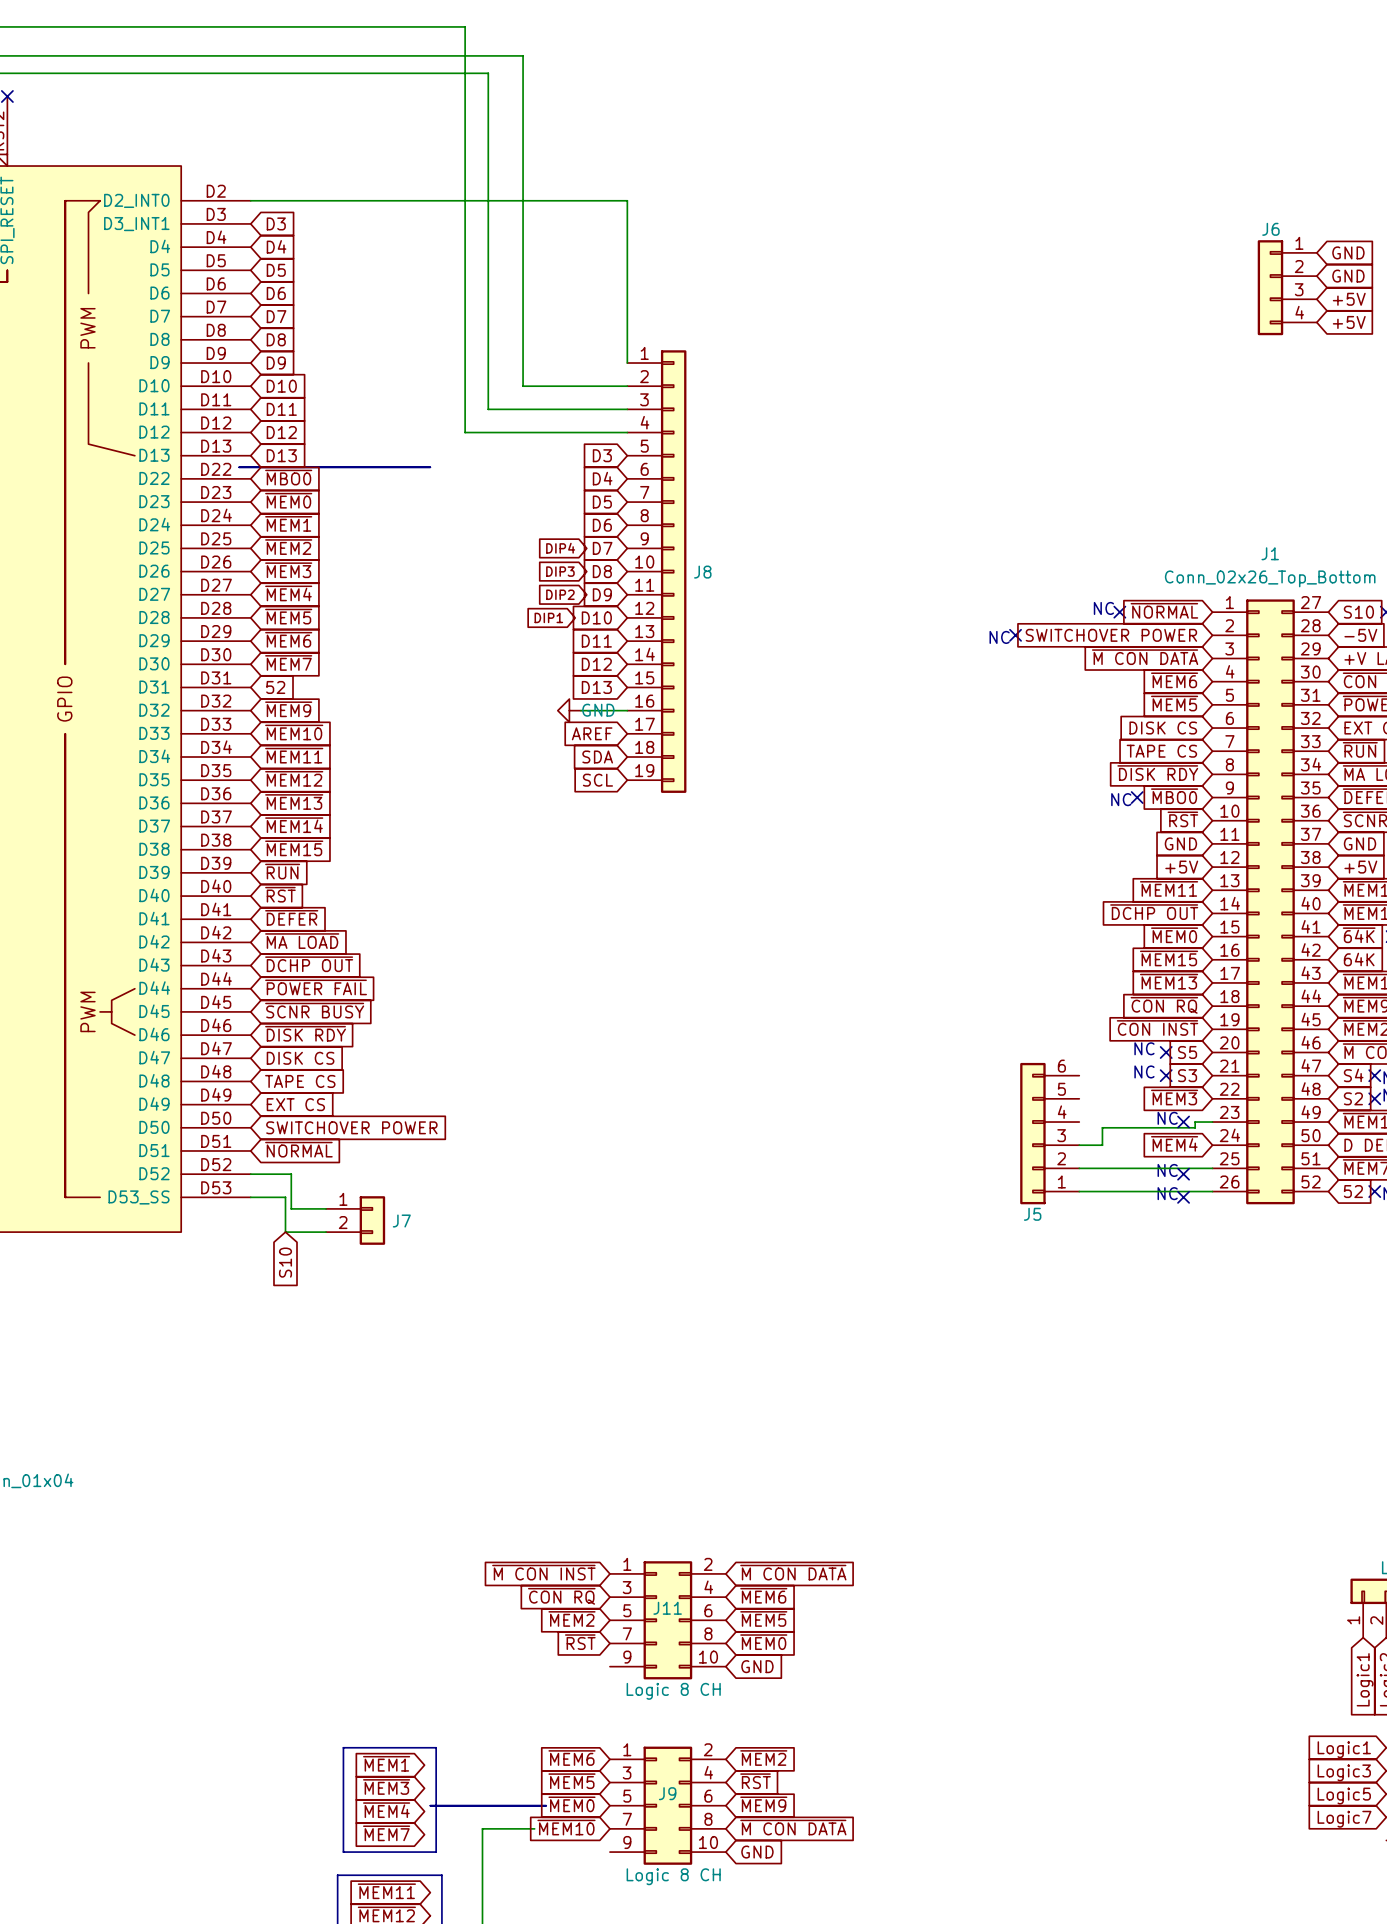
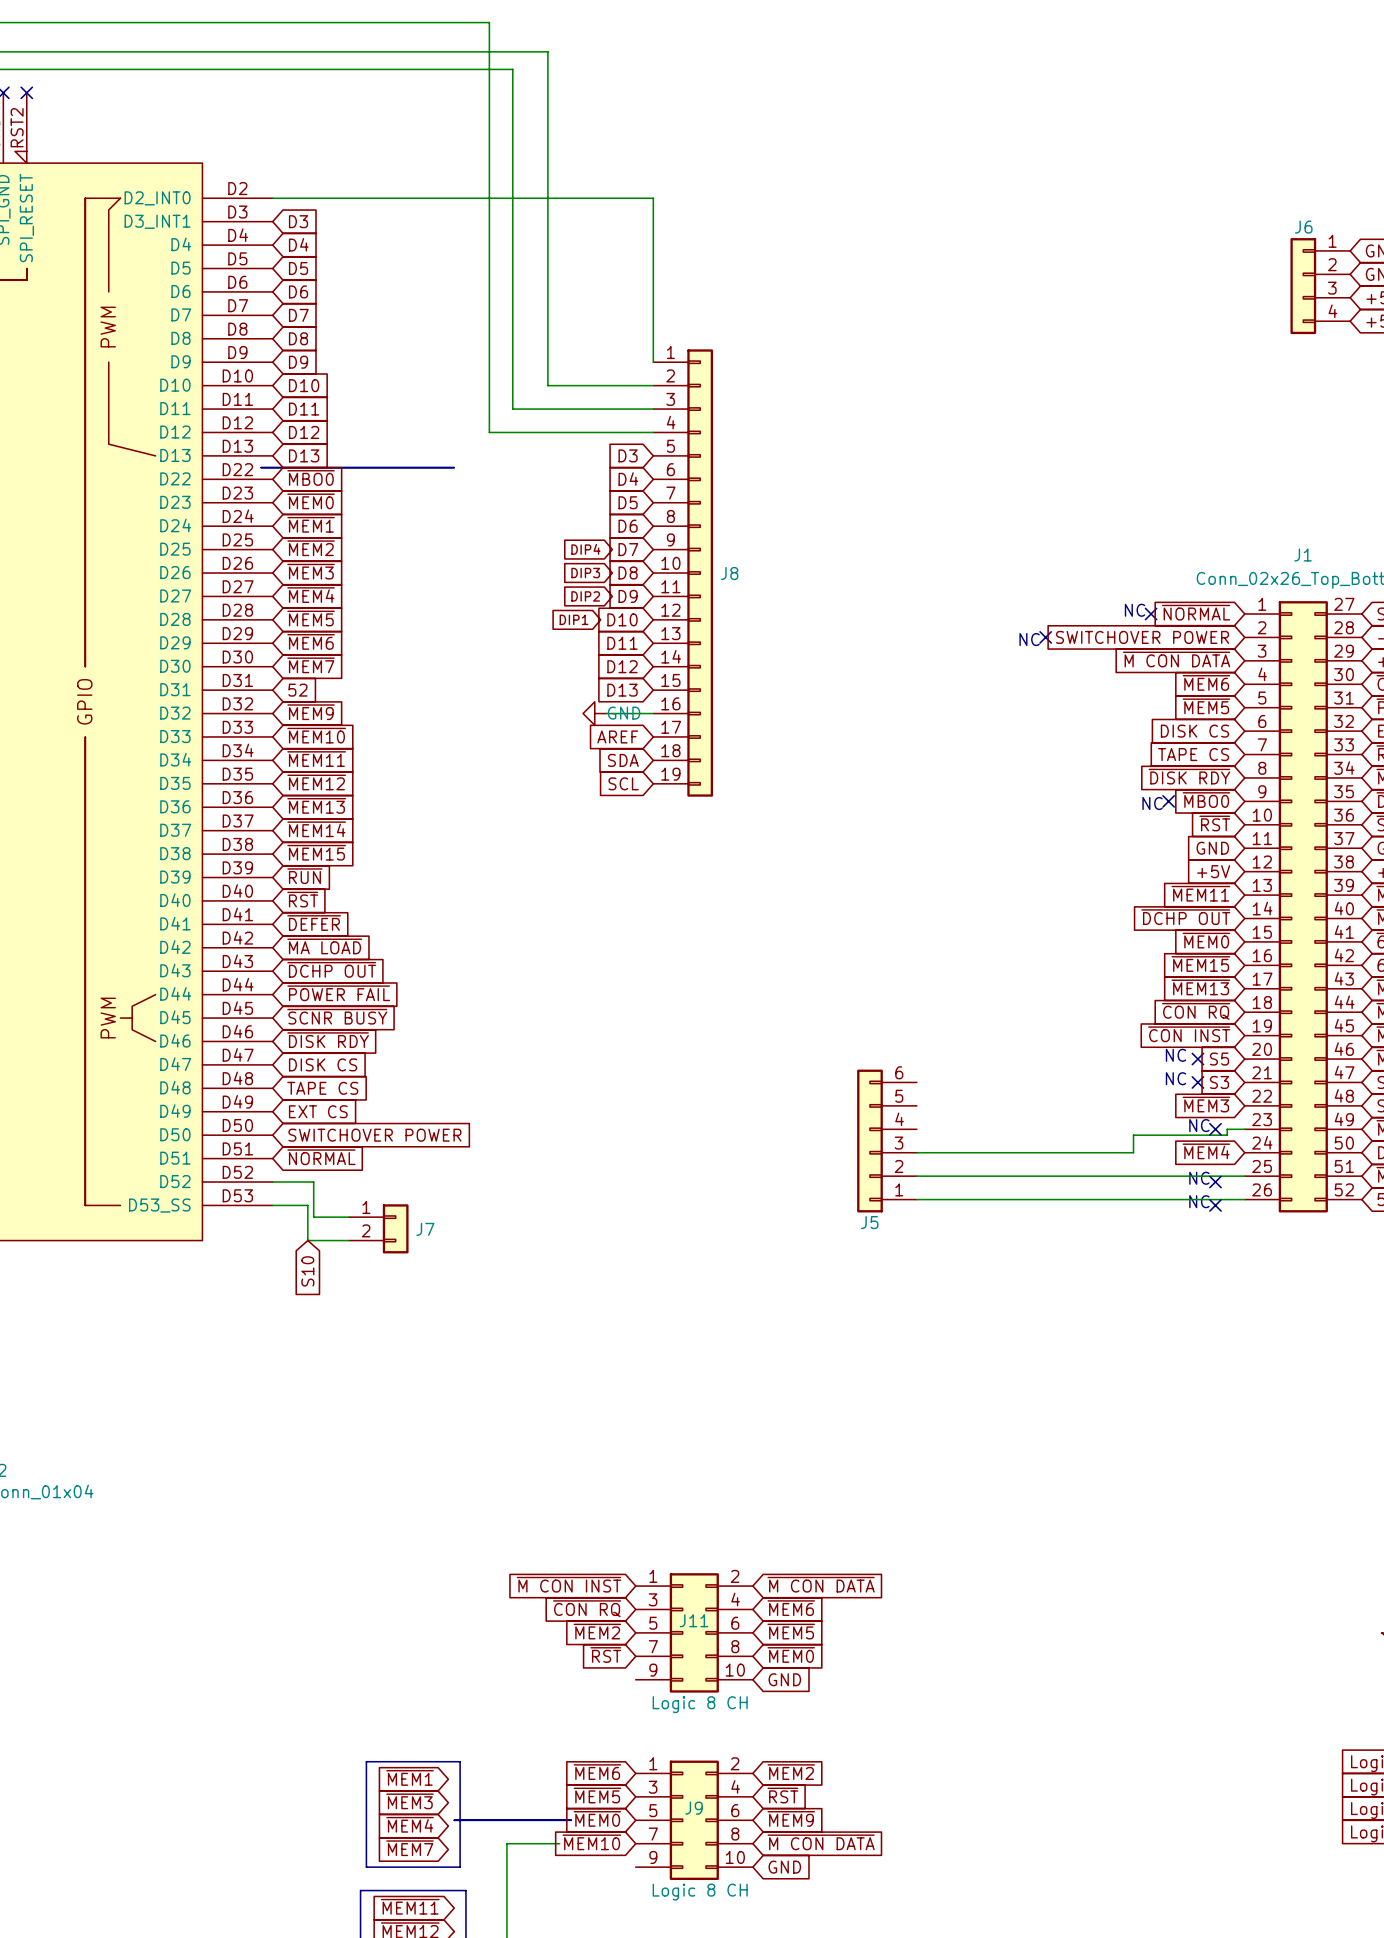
J5 position: (1049, 1133) -> (886, 1141)
wire: none -> (916, 1152) (1110, 1152)
wire: none -> (916, 1176) (1110, 1176)
wire: none -> (916, 1199) (1110, 1199)

